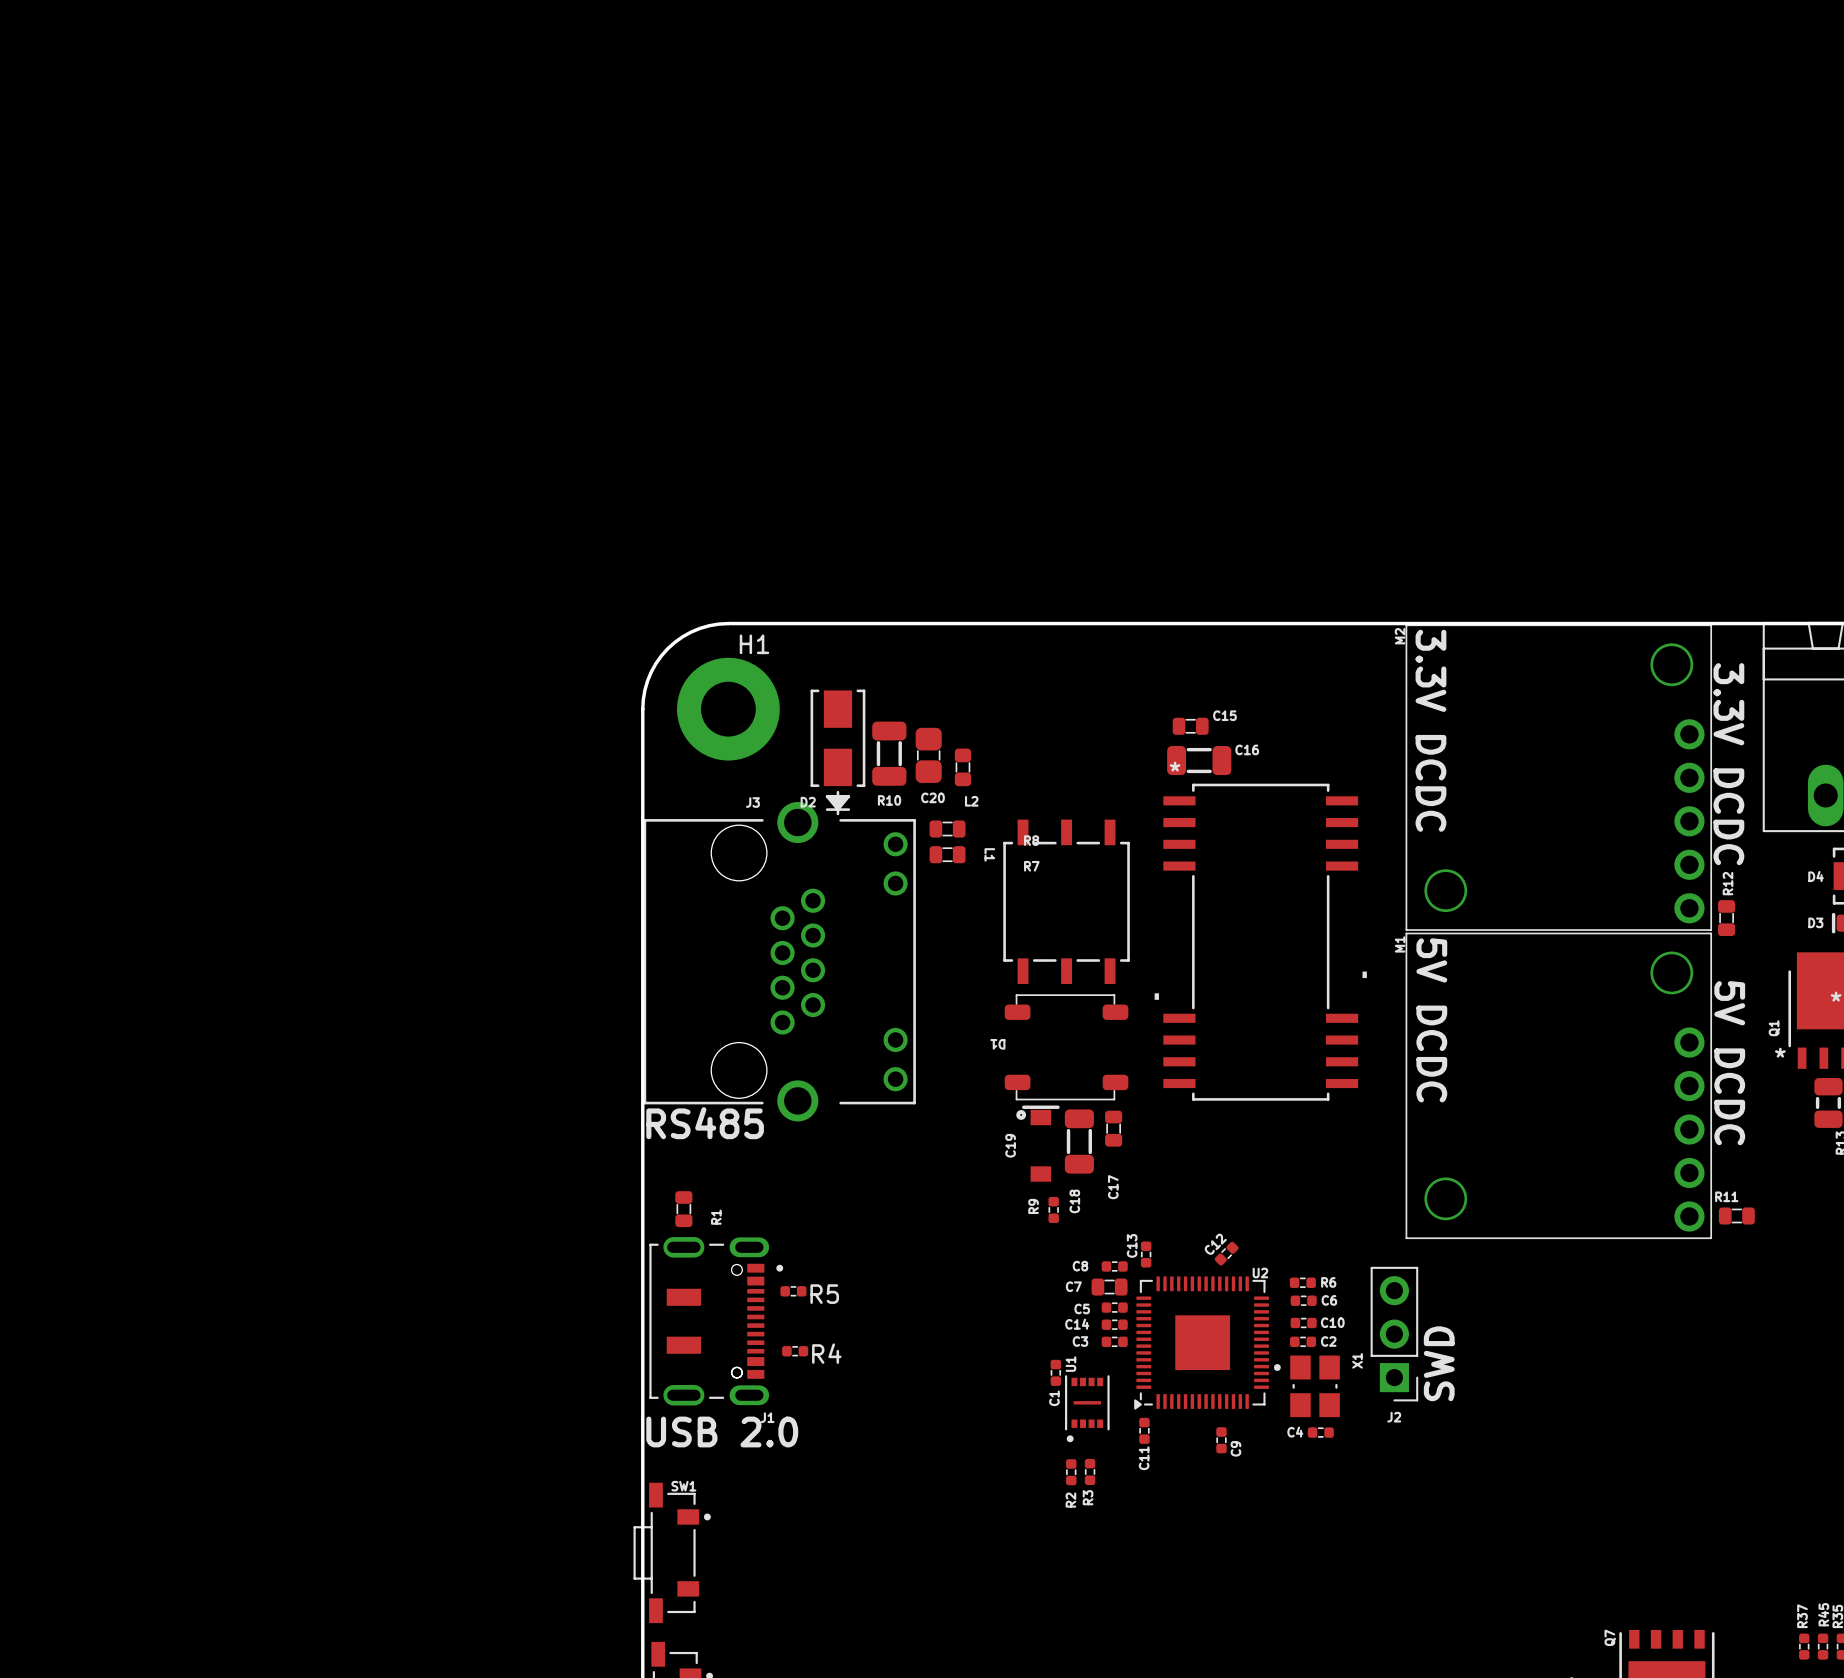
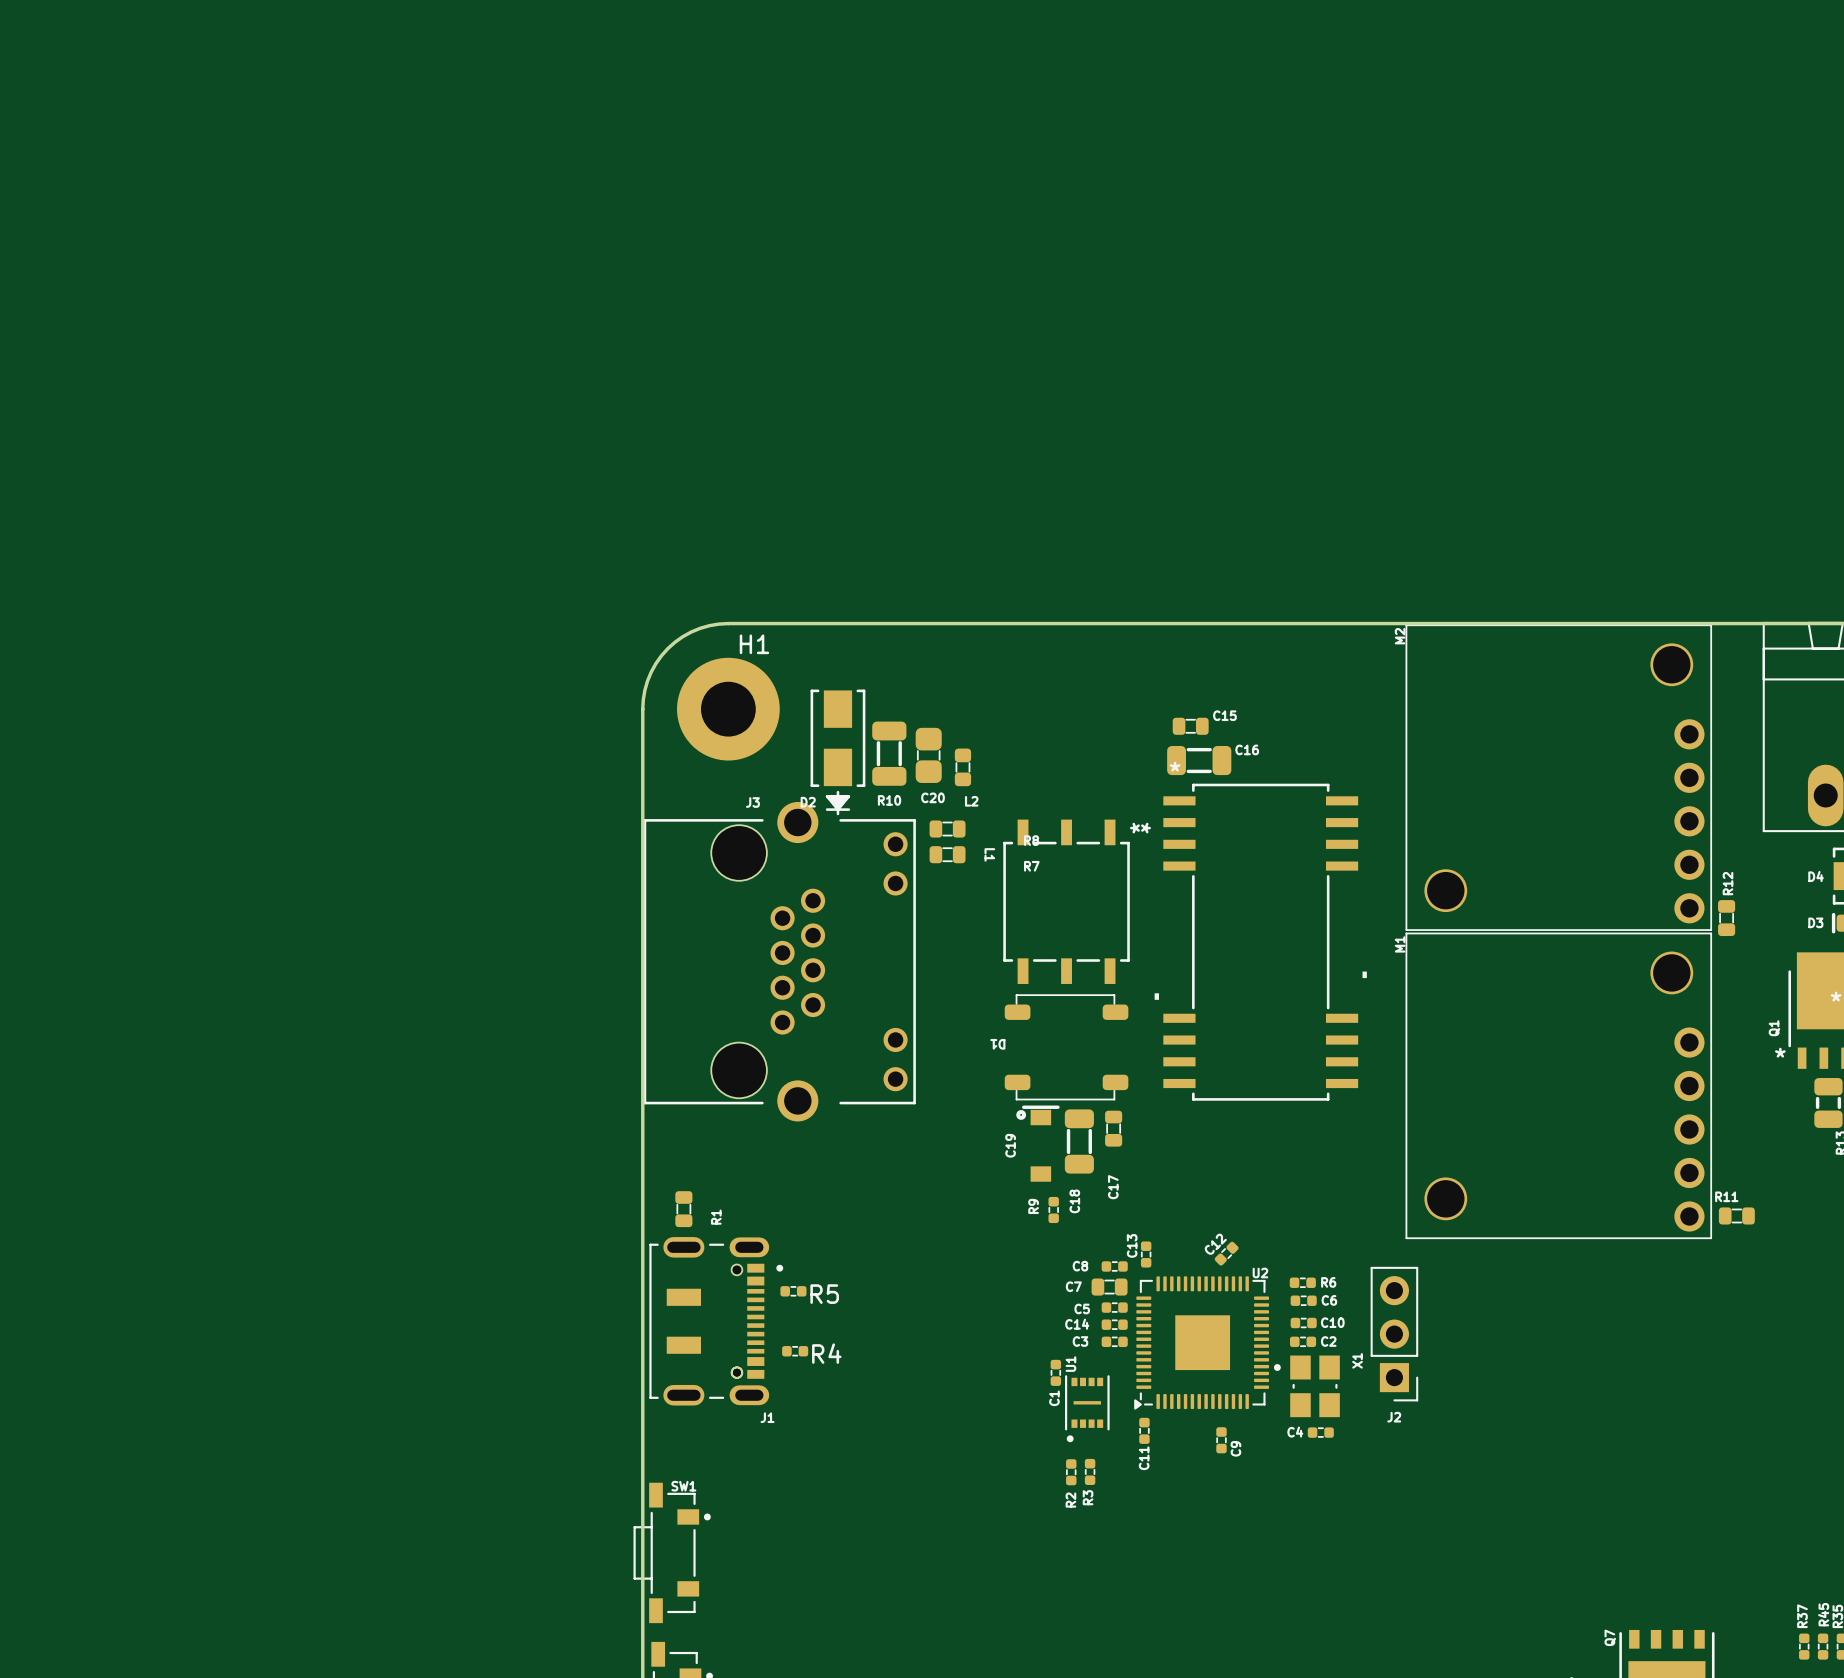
text: 3.3V DCDC (1430, 730) -> none
text: 3.3V DCDC (1728, 764) -> none
L1 footprint: [1003, 819, 1130, 984] -> [1003, 819, 1130, 984]
text: 5V DCDC (1431, 1020) -> none
text: 5V DCDC (1729, 1063) -> none
text: RS485 (705, 1123) -> none
text: SWD (1439, 1363) -> none
text: USB 2.0 (722, 1431) -> none

